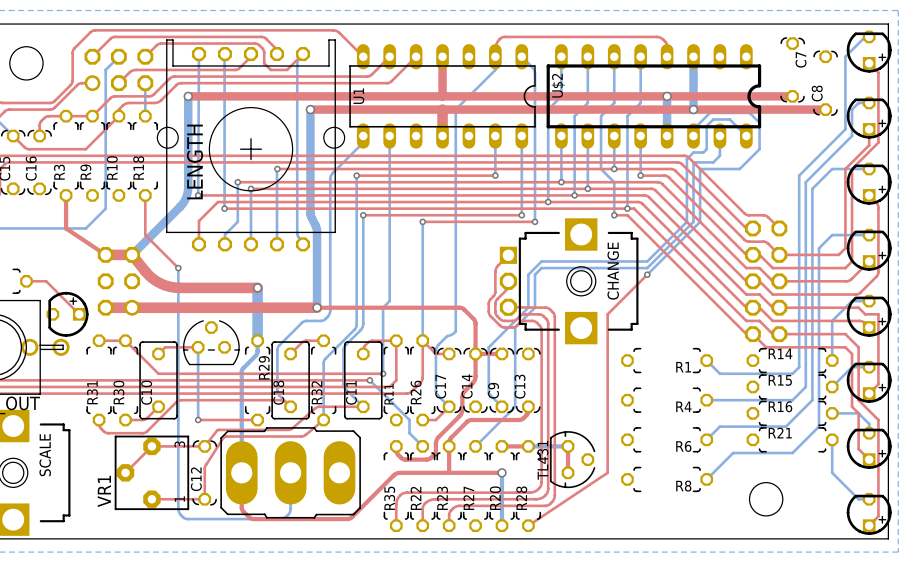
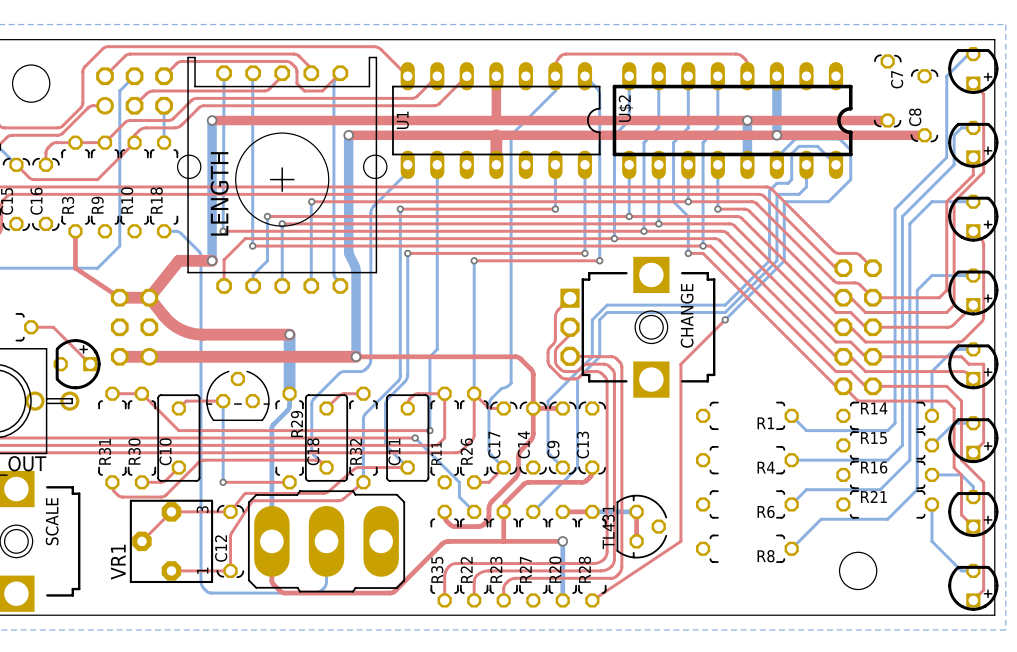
bottom track: (188, 186) (187, 195) (181, 205) (132, 254) -> (212, 221) (212, 260)
top track: (145, 195) (145, 235) (178, 268) -> none
bottom track: none -> (164, 231) (179, 232) (200, 253) (201, 312)
top track: none -> (212, 260) (178, 260) (149, 297)
via: none -> (212, 260)
via: (178, 268) -> none

